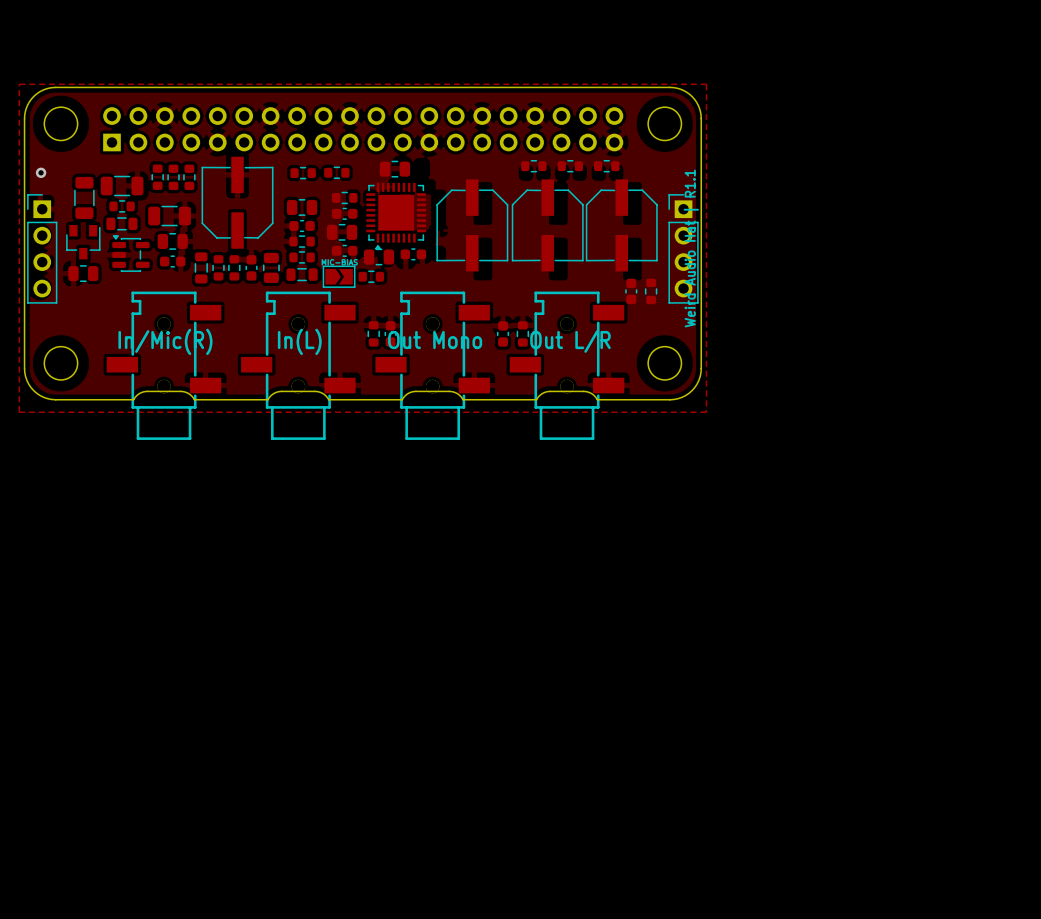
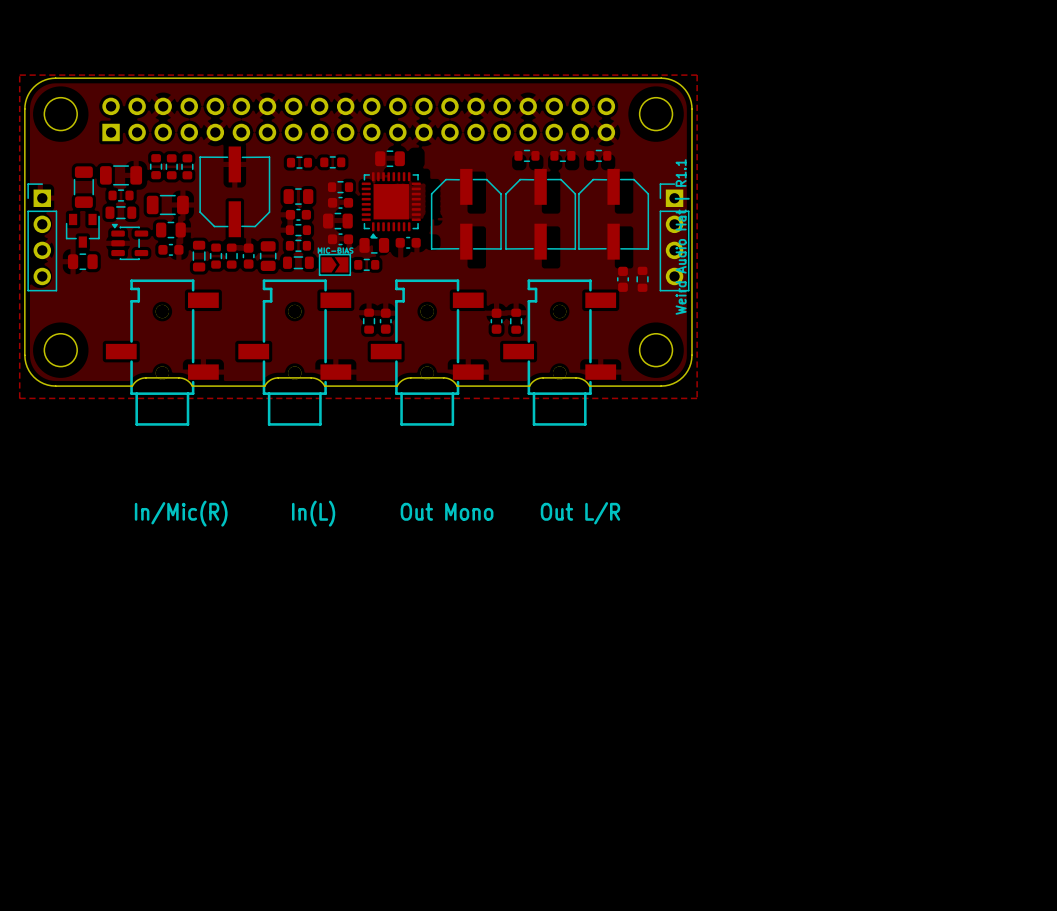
via: (41, 172) -> none
text position: Out Mono (435, 340) -> Out Mono (447, 511)
text position: In/Mic(R) (165, 341) -> In/Mic(R) (181, 513)
text position: In(L) (299, 341) -> In(L) (313, 513)
text position: Out L/R (570, 341) -> Out L/R (580, 513)

